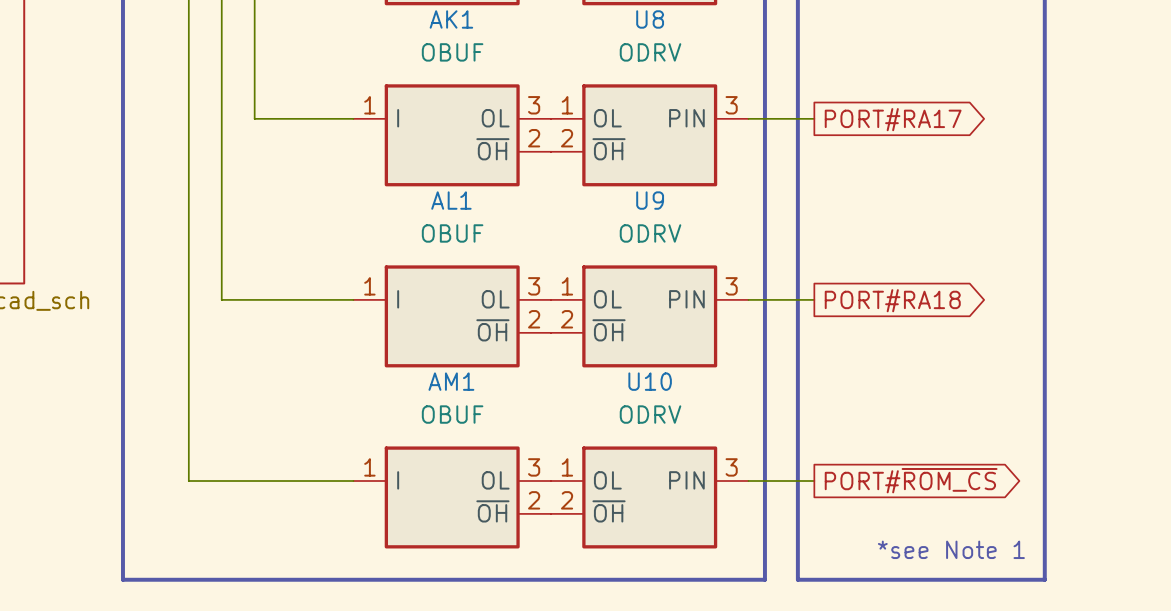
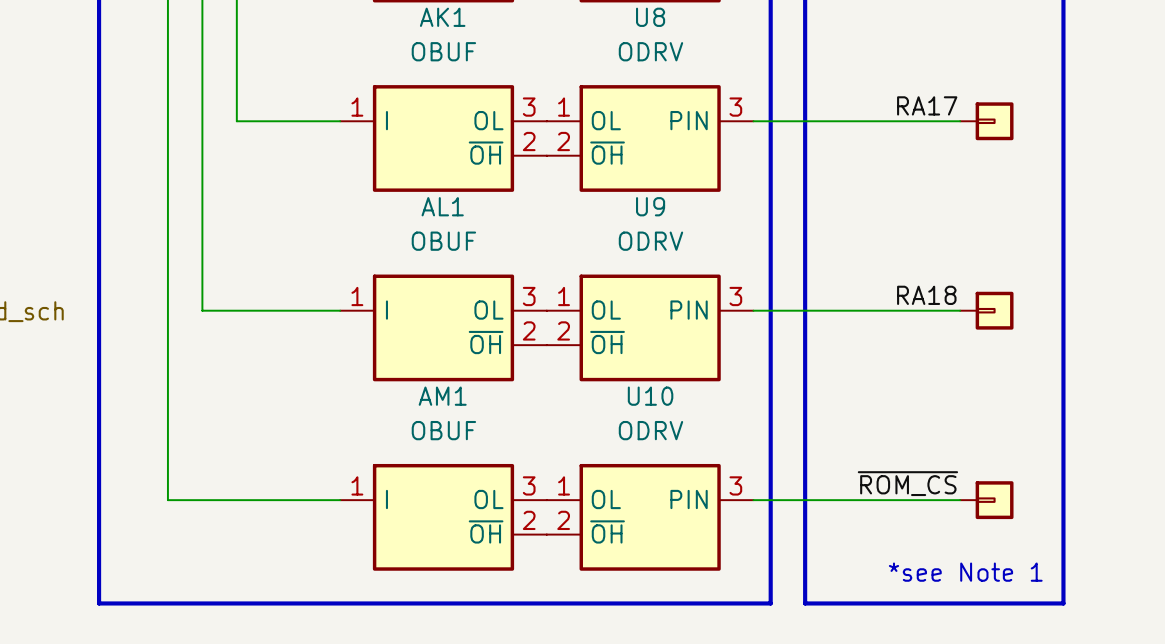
label: none -> RA17 (927, 105)
wire: none -> (822, 121) (960, 121)
part: none -> (986, 121)
global label: PORT#RA17 (893, 119) -> none
label: none -> RA18 (926, 295)
wire: none -> (822, 310) (960, 310)
part: none -> (986, 310)
global label: PORT#RA18 (892, 300) -> none
label: none -> ~{ROM_CS} (907, 483)
global label: PORT#~{ROM_CS} (911, 480) -> none
wire: none -> (822, 500) (960, 500)
part: none -> (986, 500)

